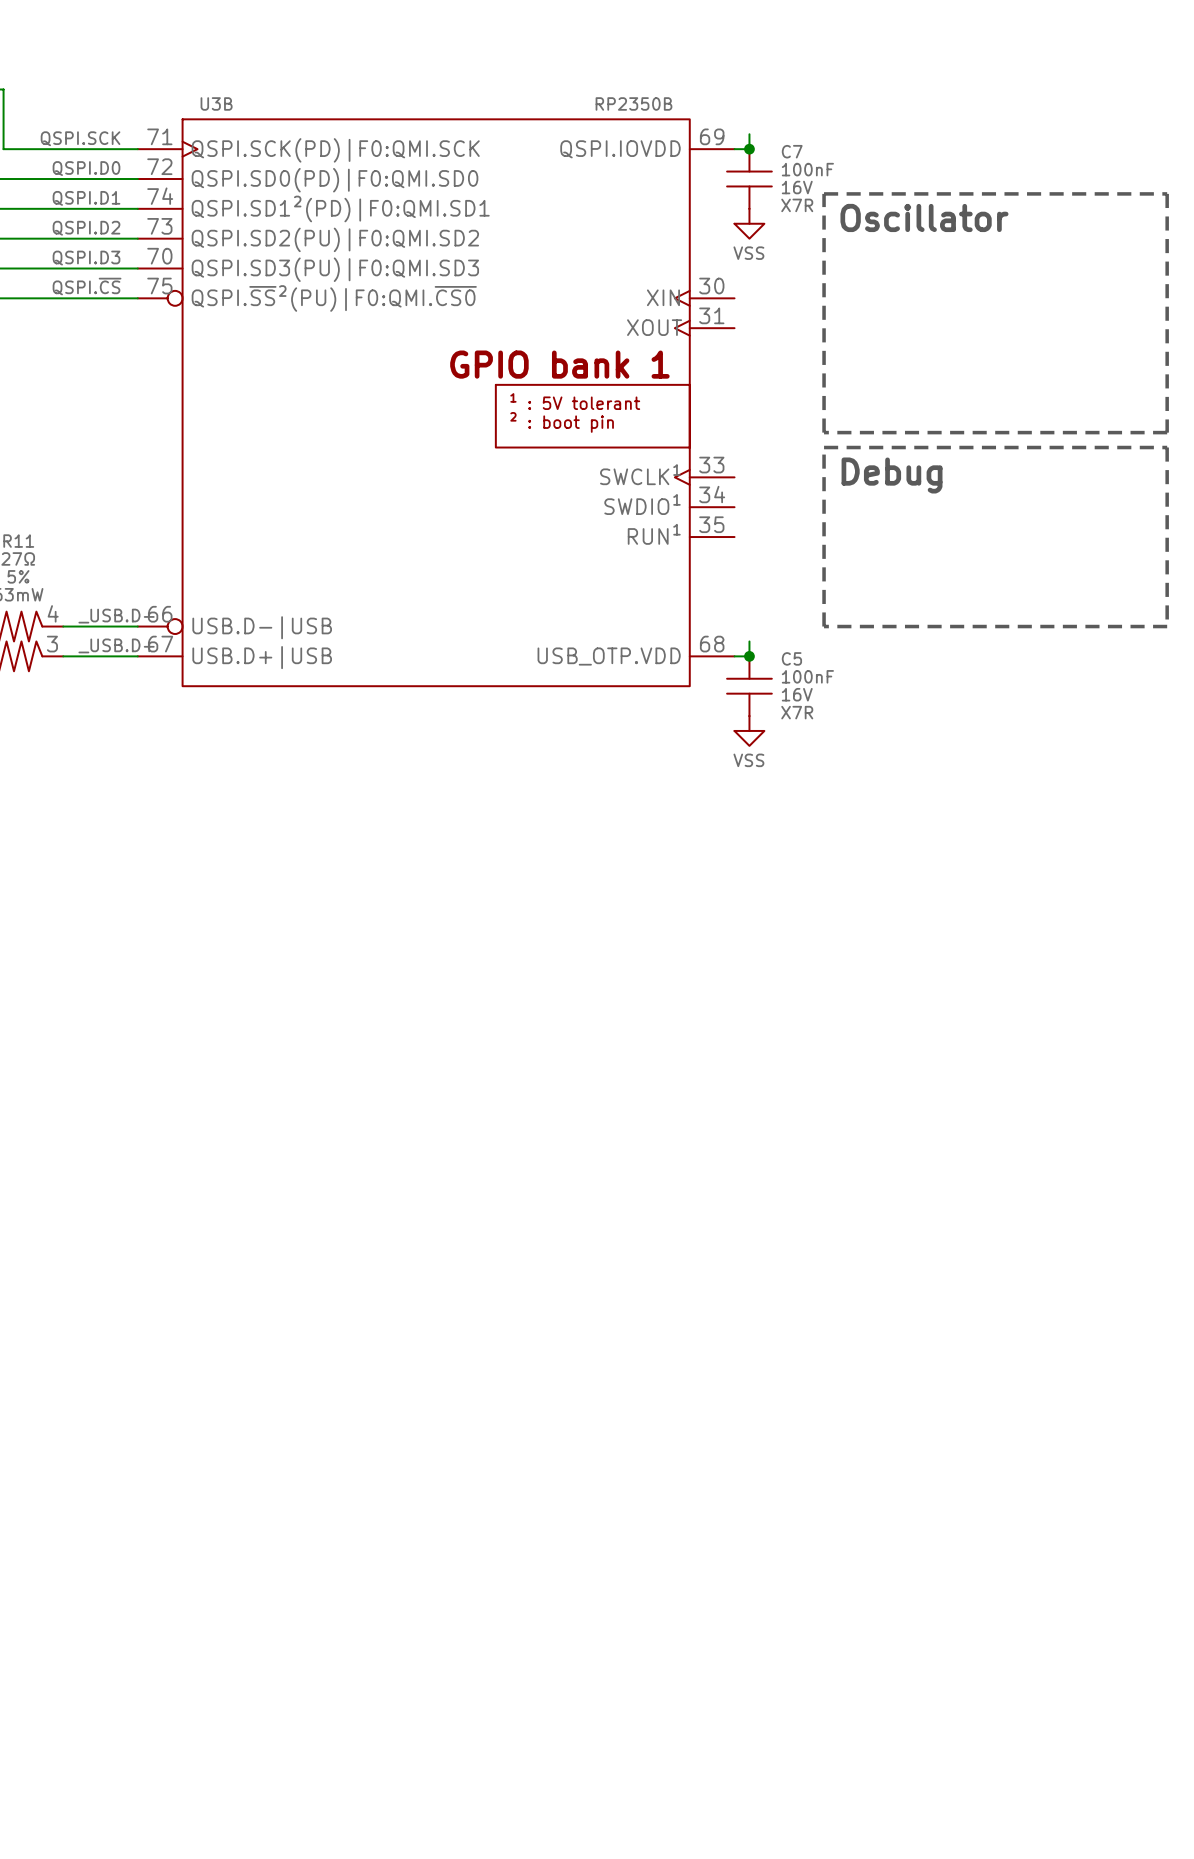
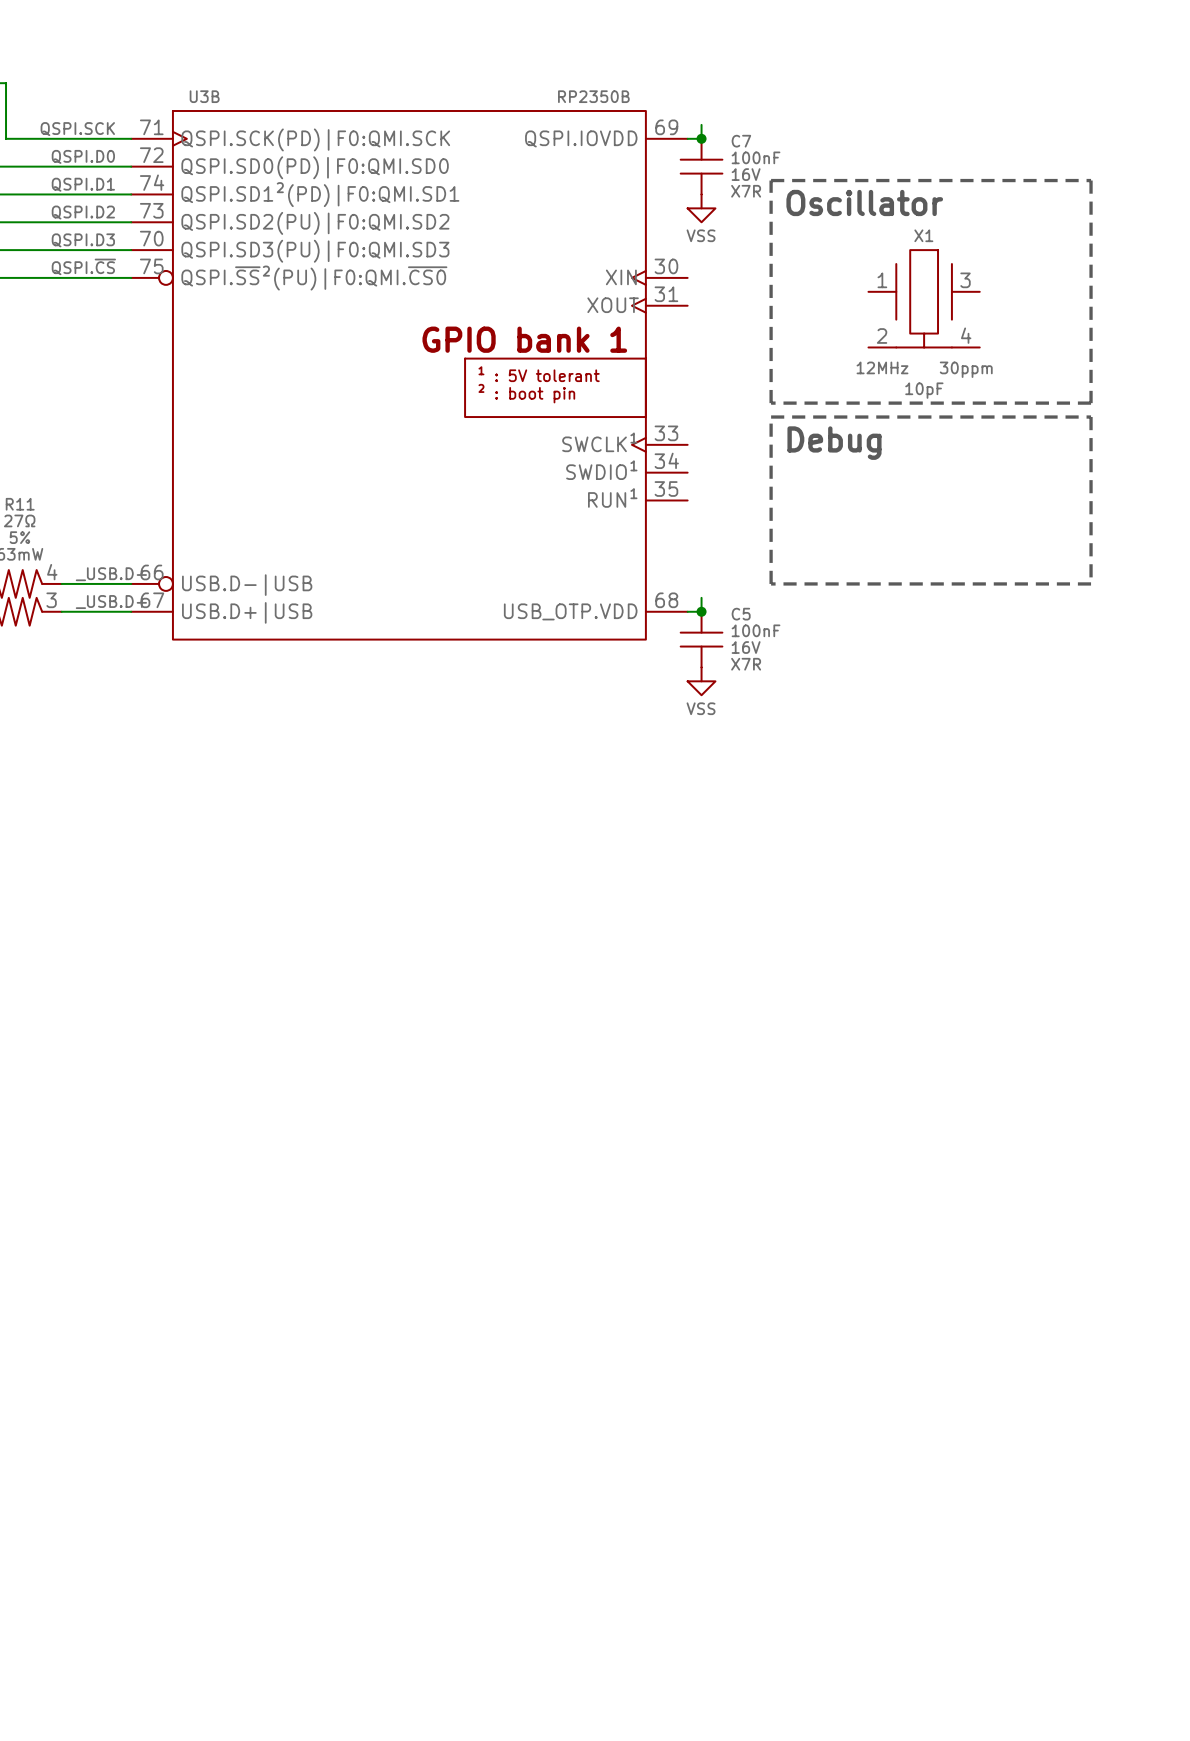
X1: none -> (924, 298)

